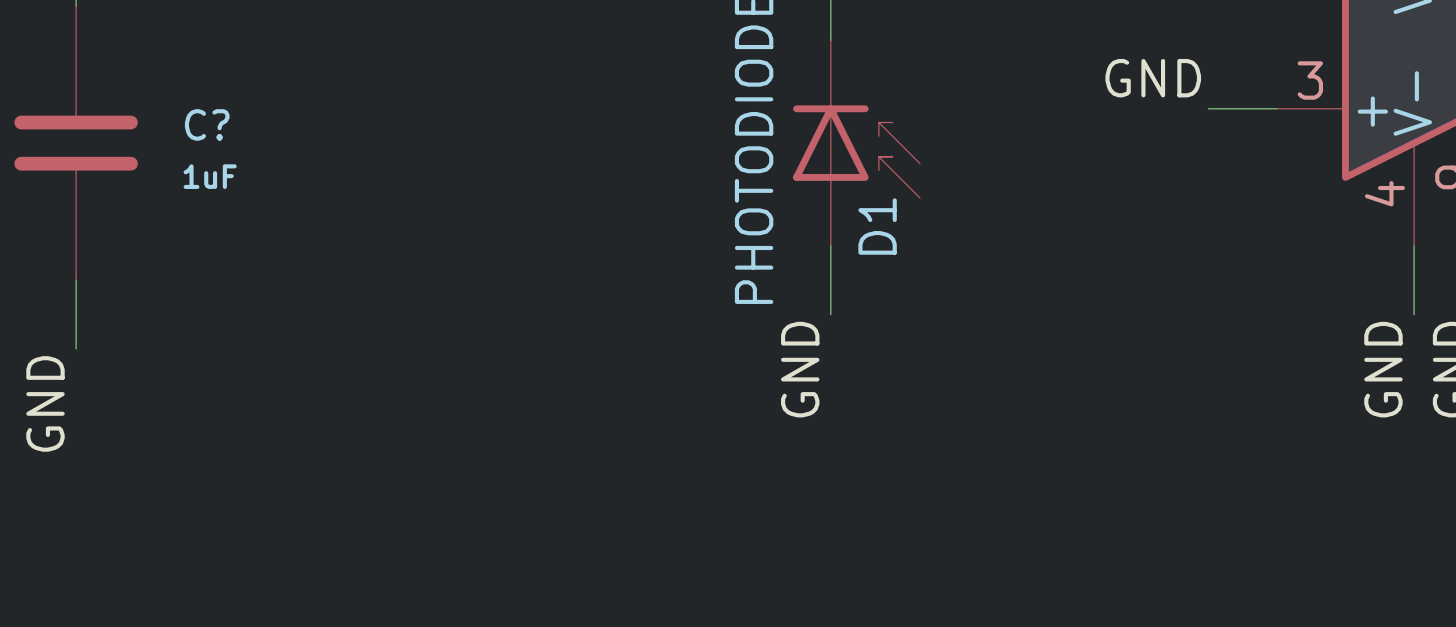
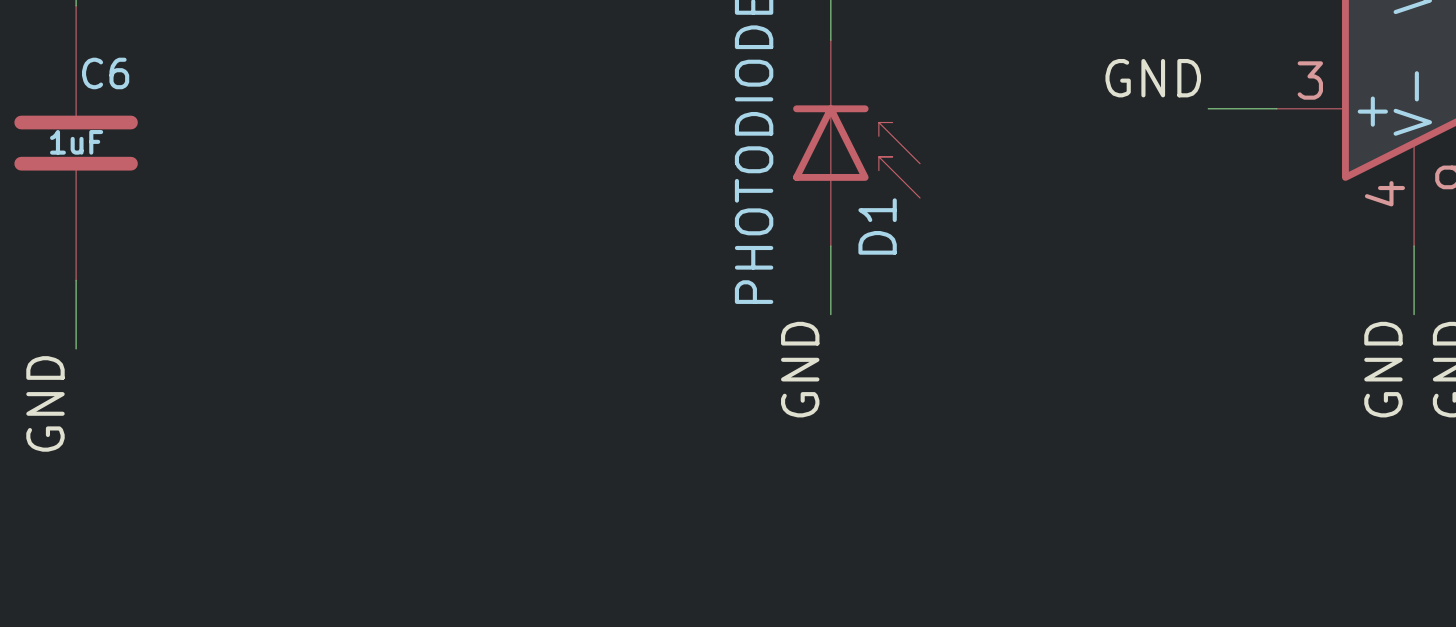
C? name: C? (207, 124) -> C6 (105, 73)
C? value position: 1uF (210, 176) -> 1uF (76, 142)

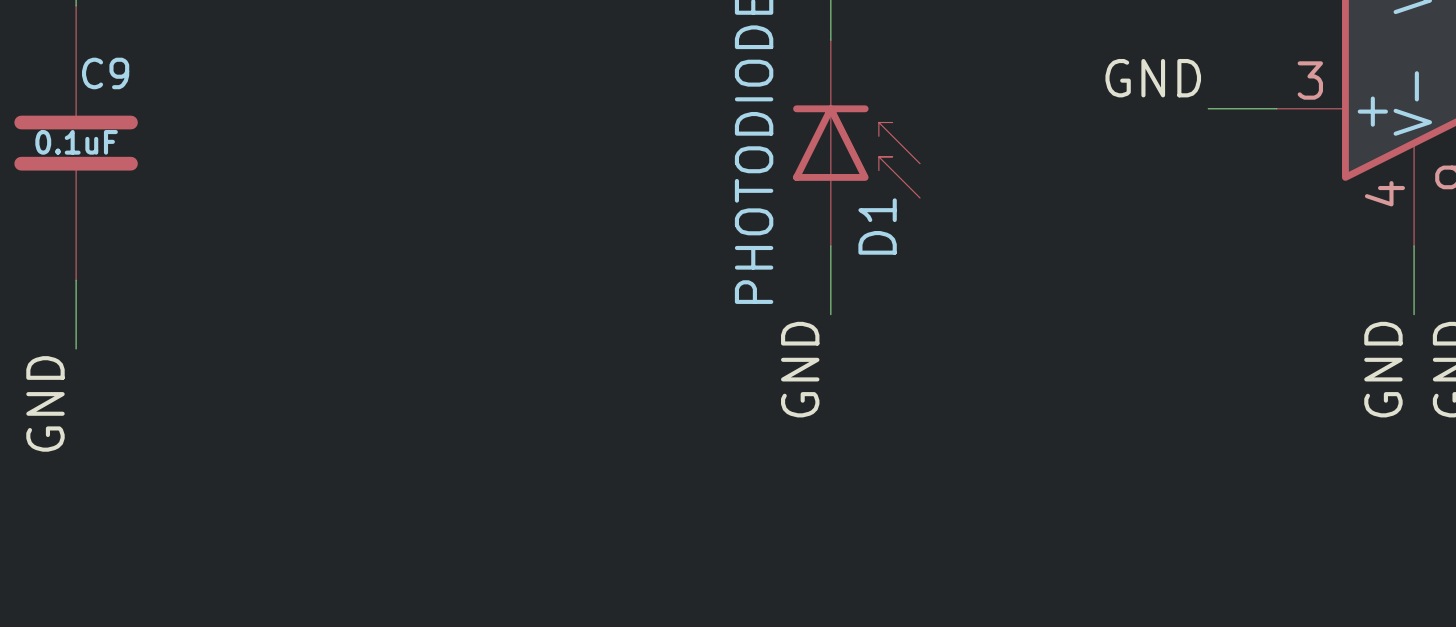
C6 name: C6 (105, 73) -> C9 (105, 73)
C6 value: 1uF (76, 142) -> 0.1uF (76, 142)

